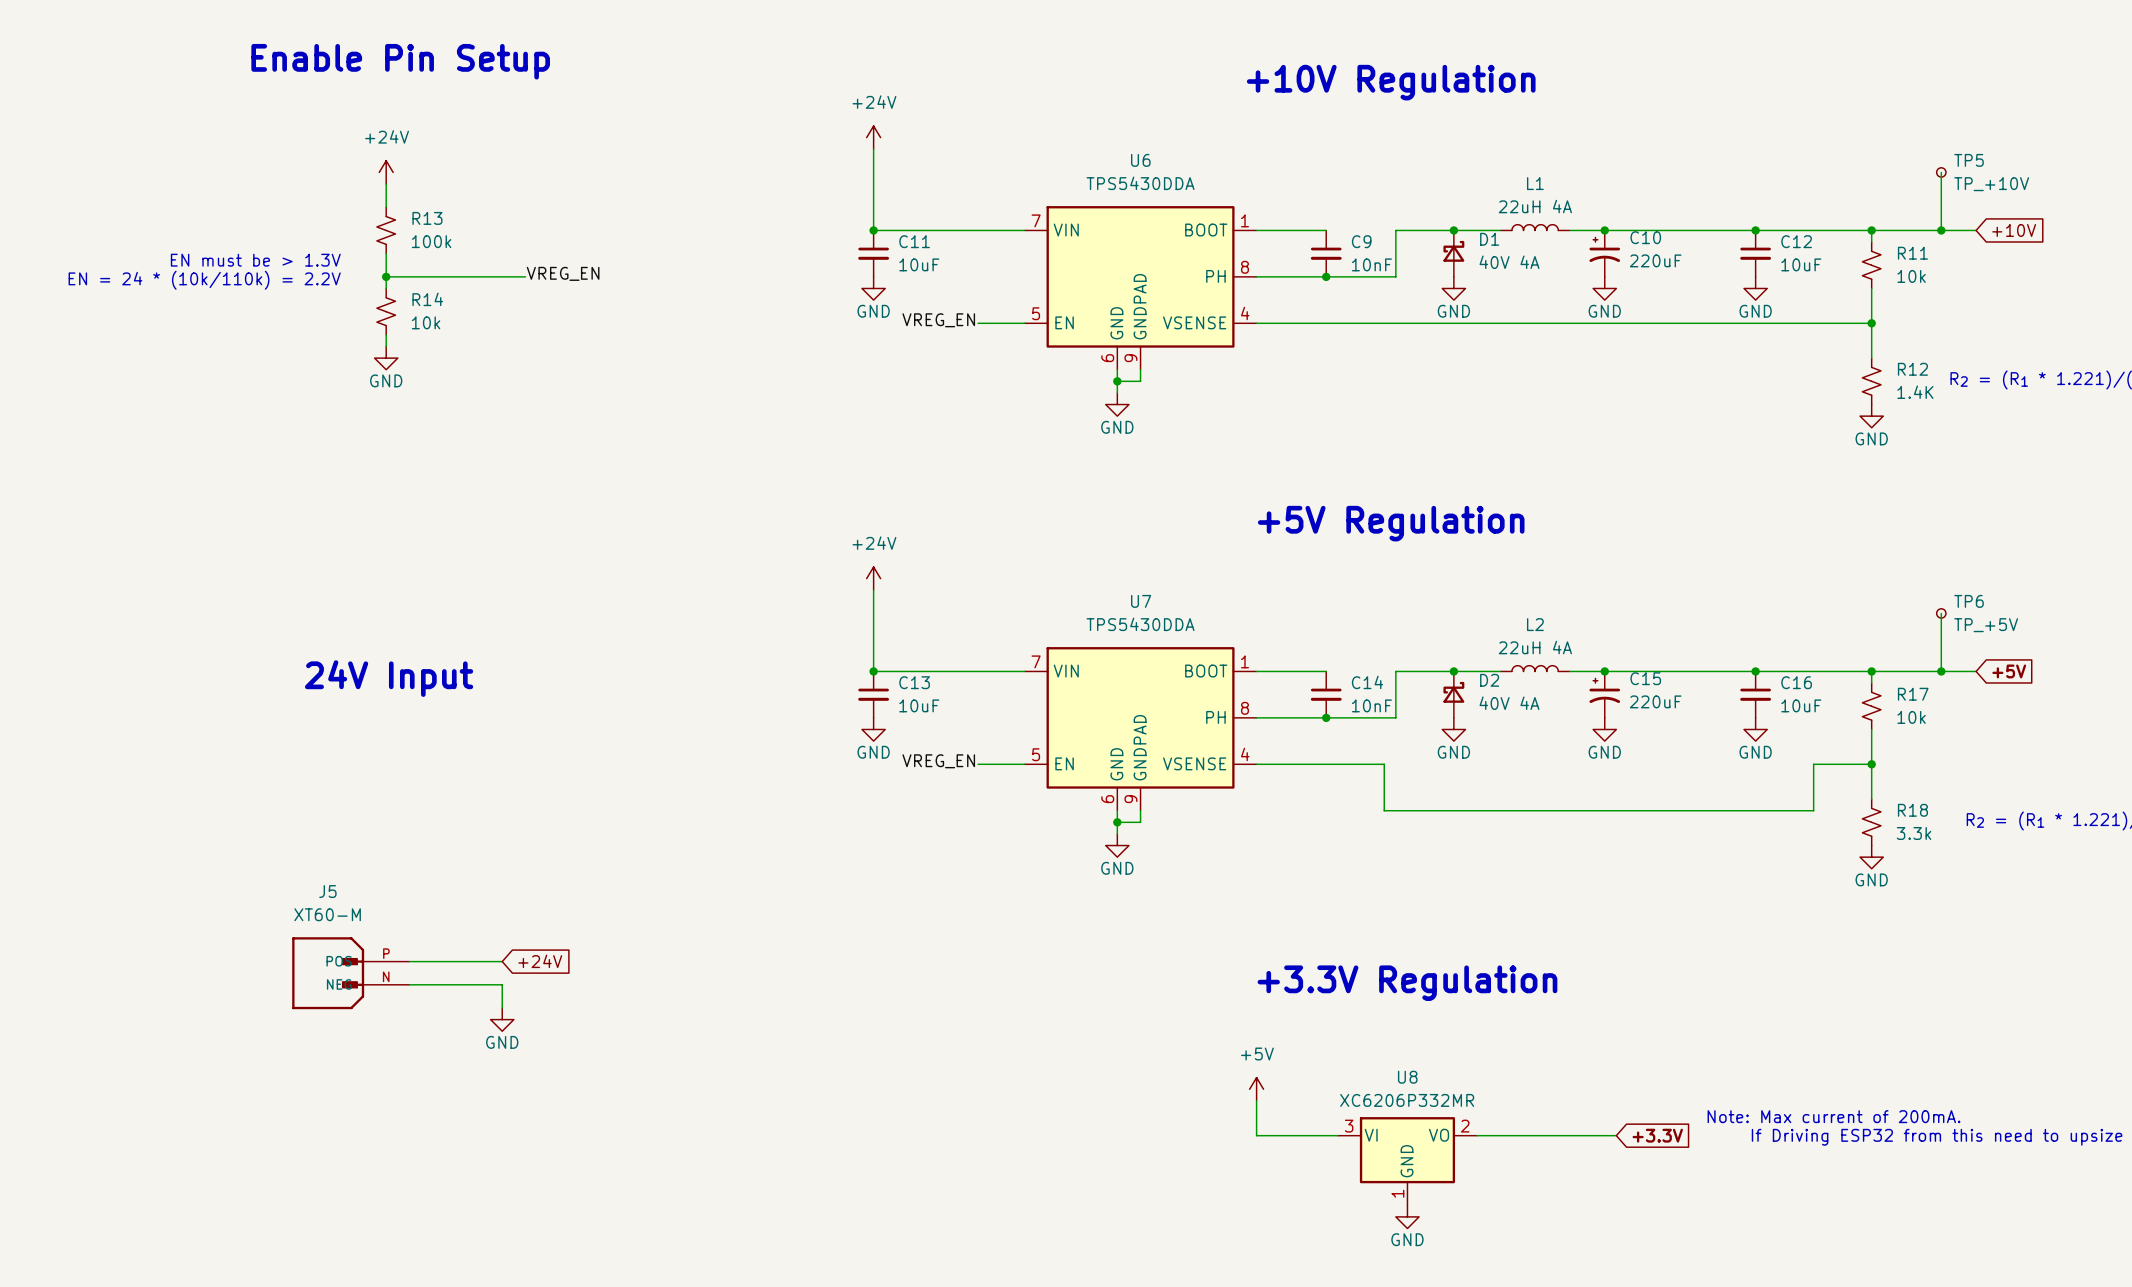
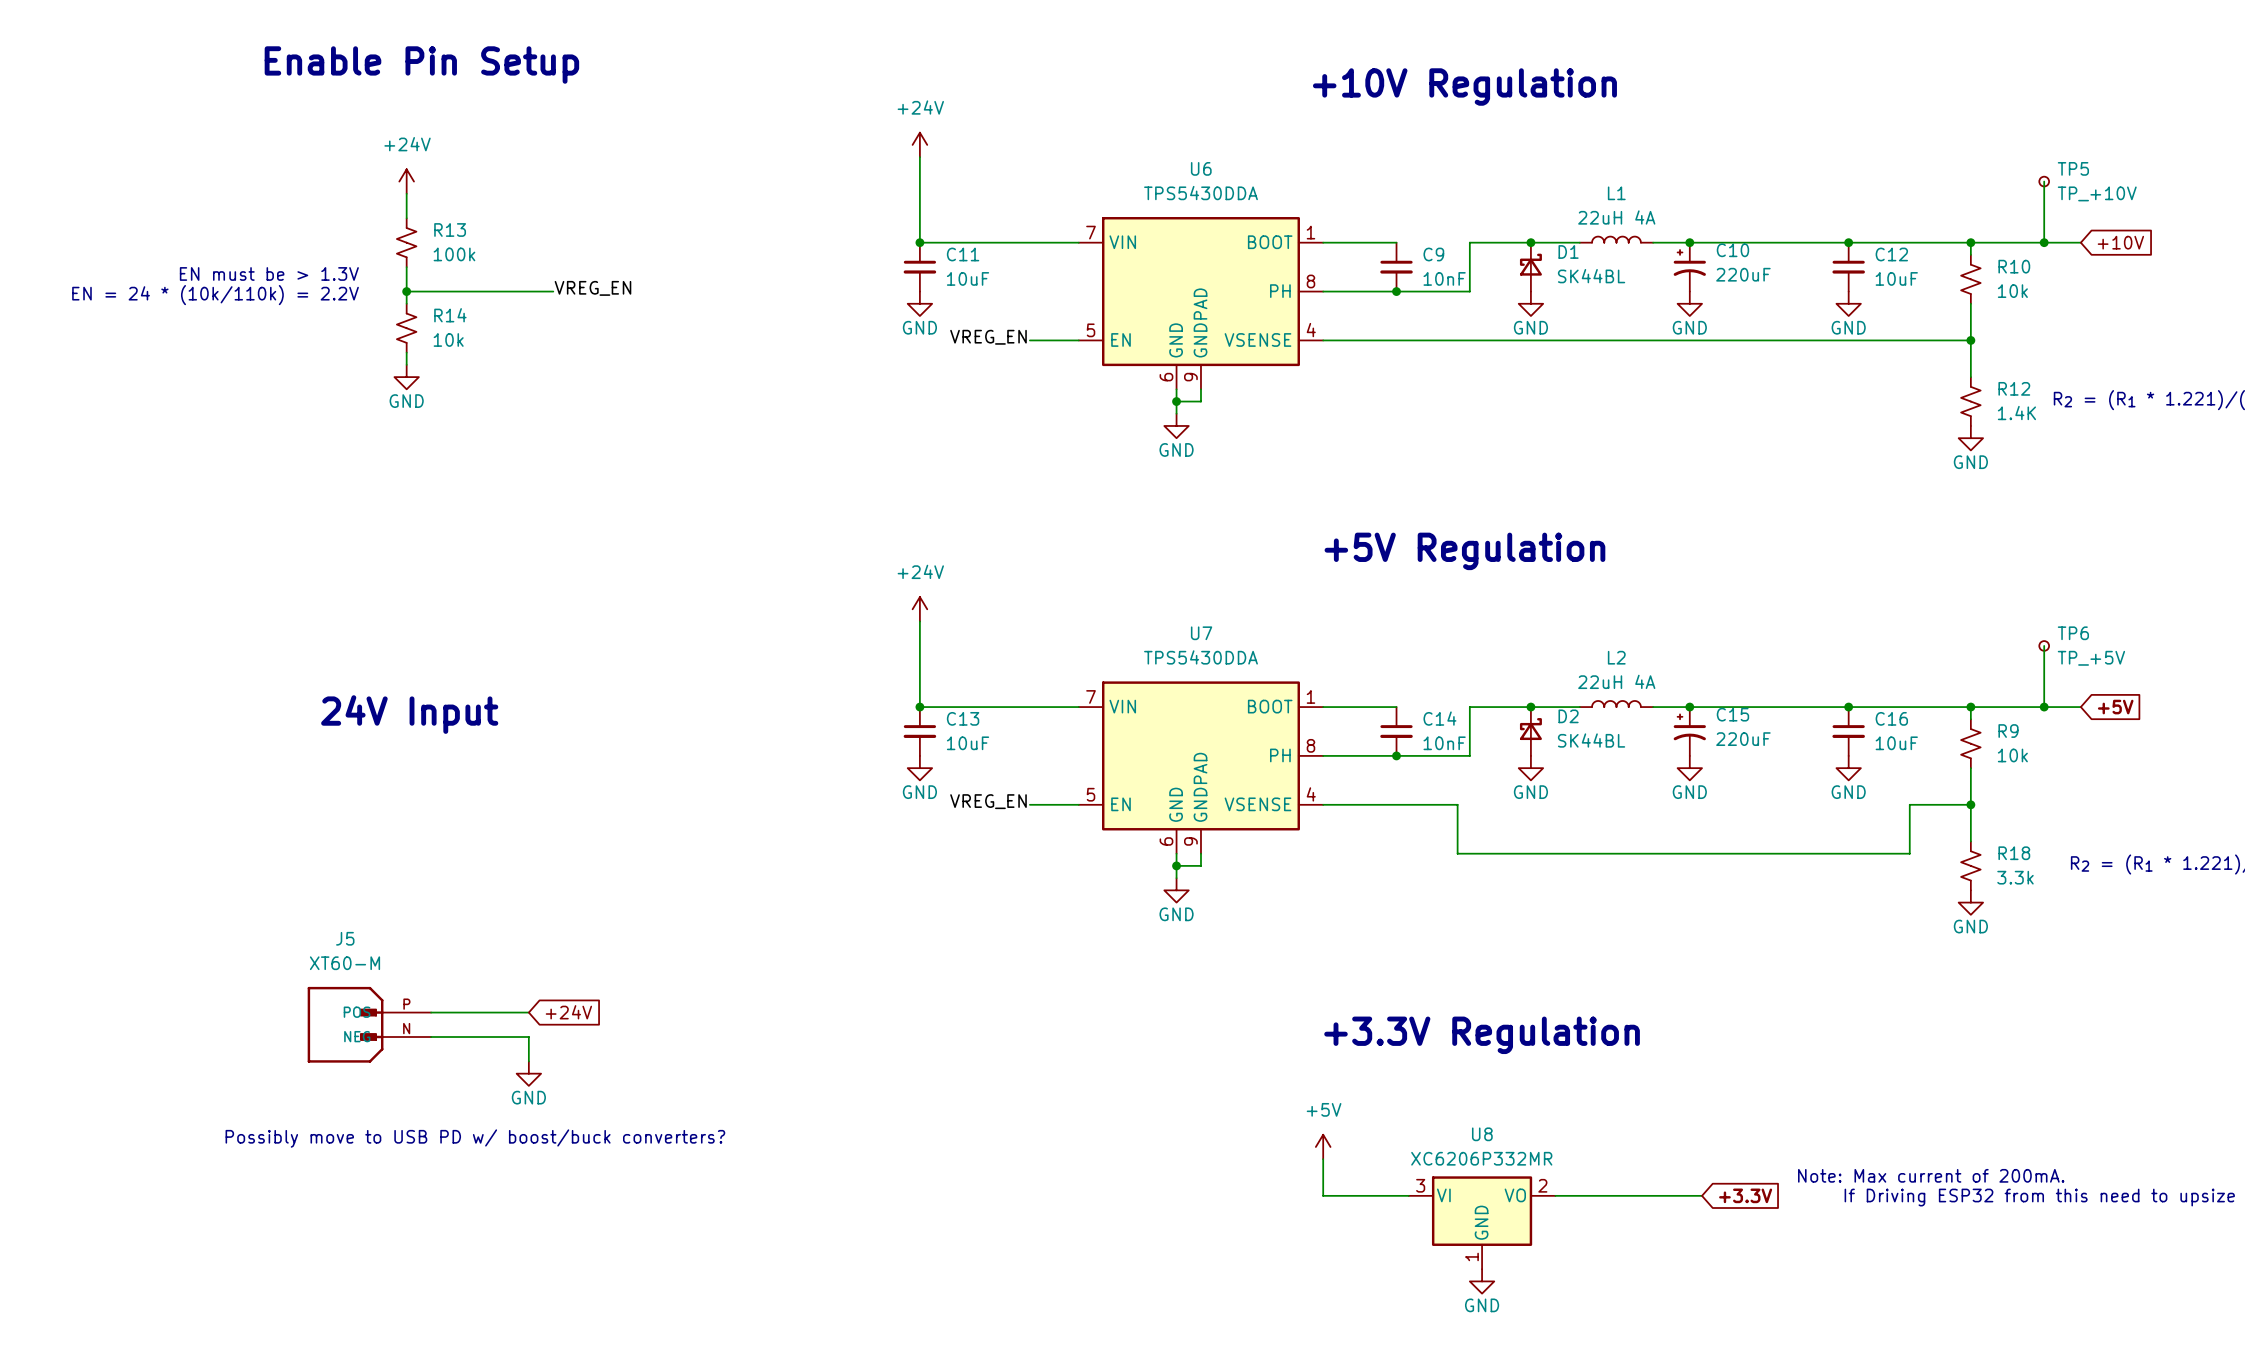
R11 name: R11 (1912, 253) -> R10 (2014, 266)
D1 value: 40V 4A (1509, 262) -> SK44BL (1591, 276)
R17 name: R17 (1913, 694) -> R9 (2008, 731)
D2 value: 40V 4A (1509, 703) -> SK44BL (1591, 740)
text: none -> Possibly move to USB PD w/ boost/buck converters? (475, 1138)

